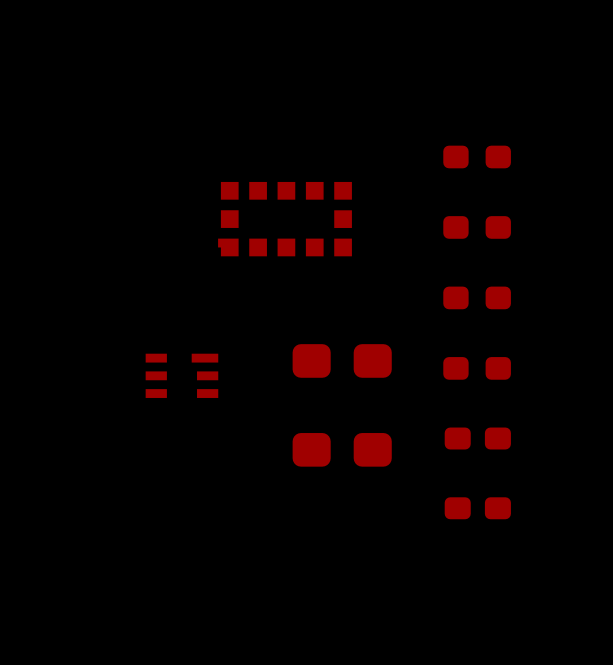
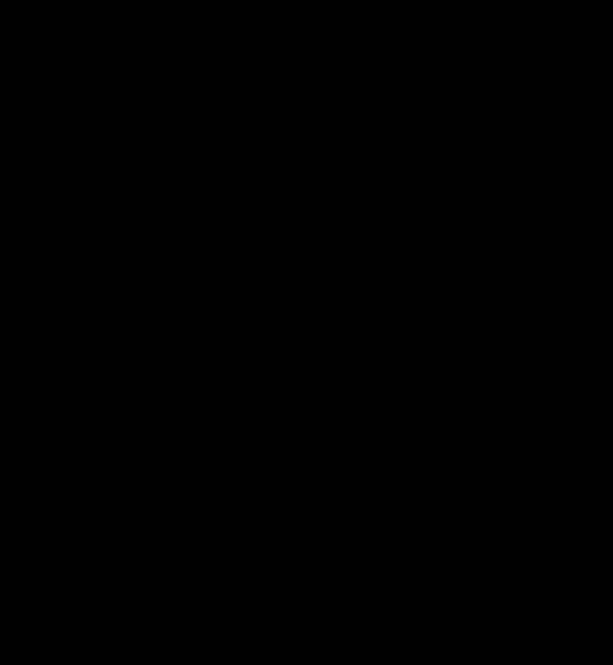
part: (477, 156) -> none
part: (285, 219) -> none
part: (477, 227) -> none
part: (477, 297) -> none
part: (342, 360) -> none
part: (477, 368) -> none
part: (181, 375) -> none
part: (477, 438) -> none
part: (342, 449) -> none
part: (477, 508) -> none

